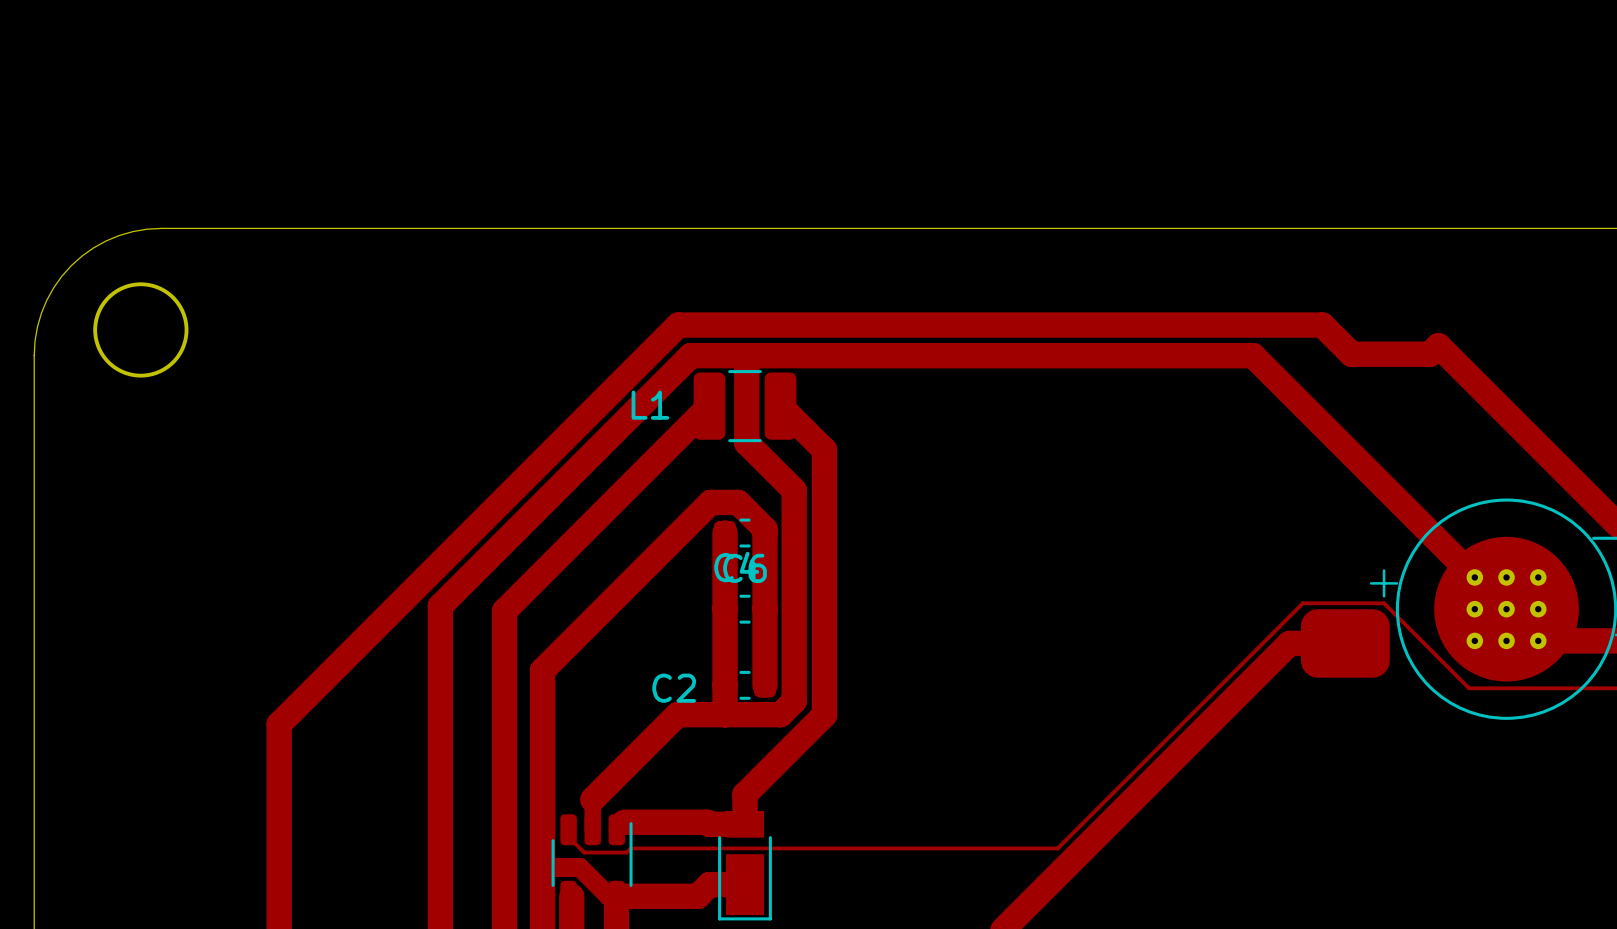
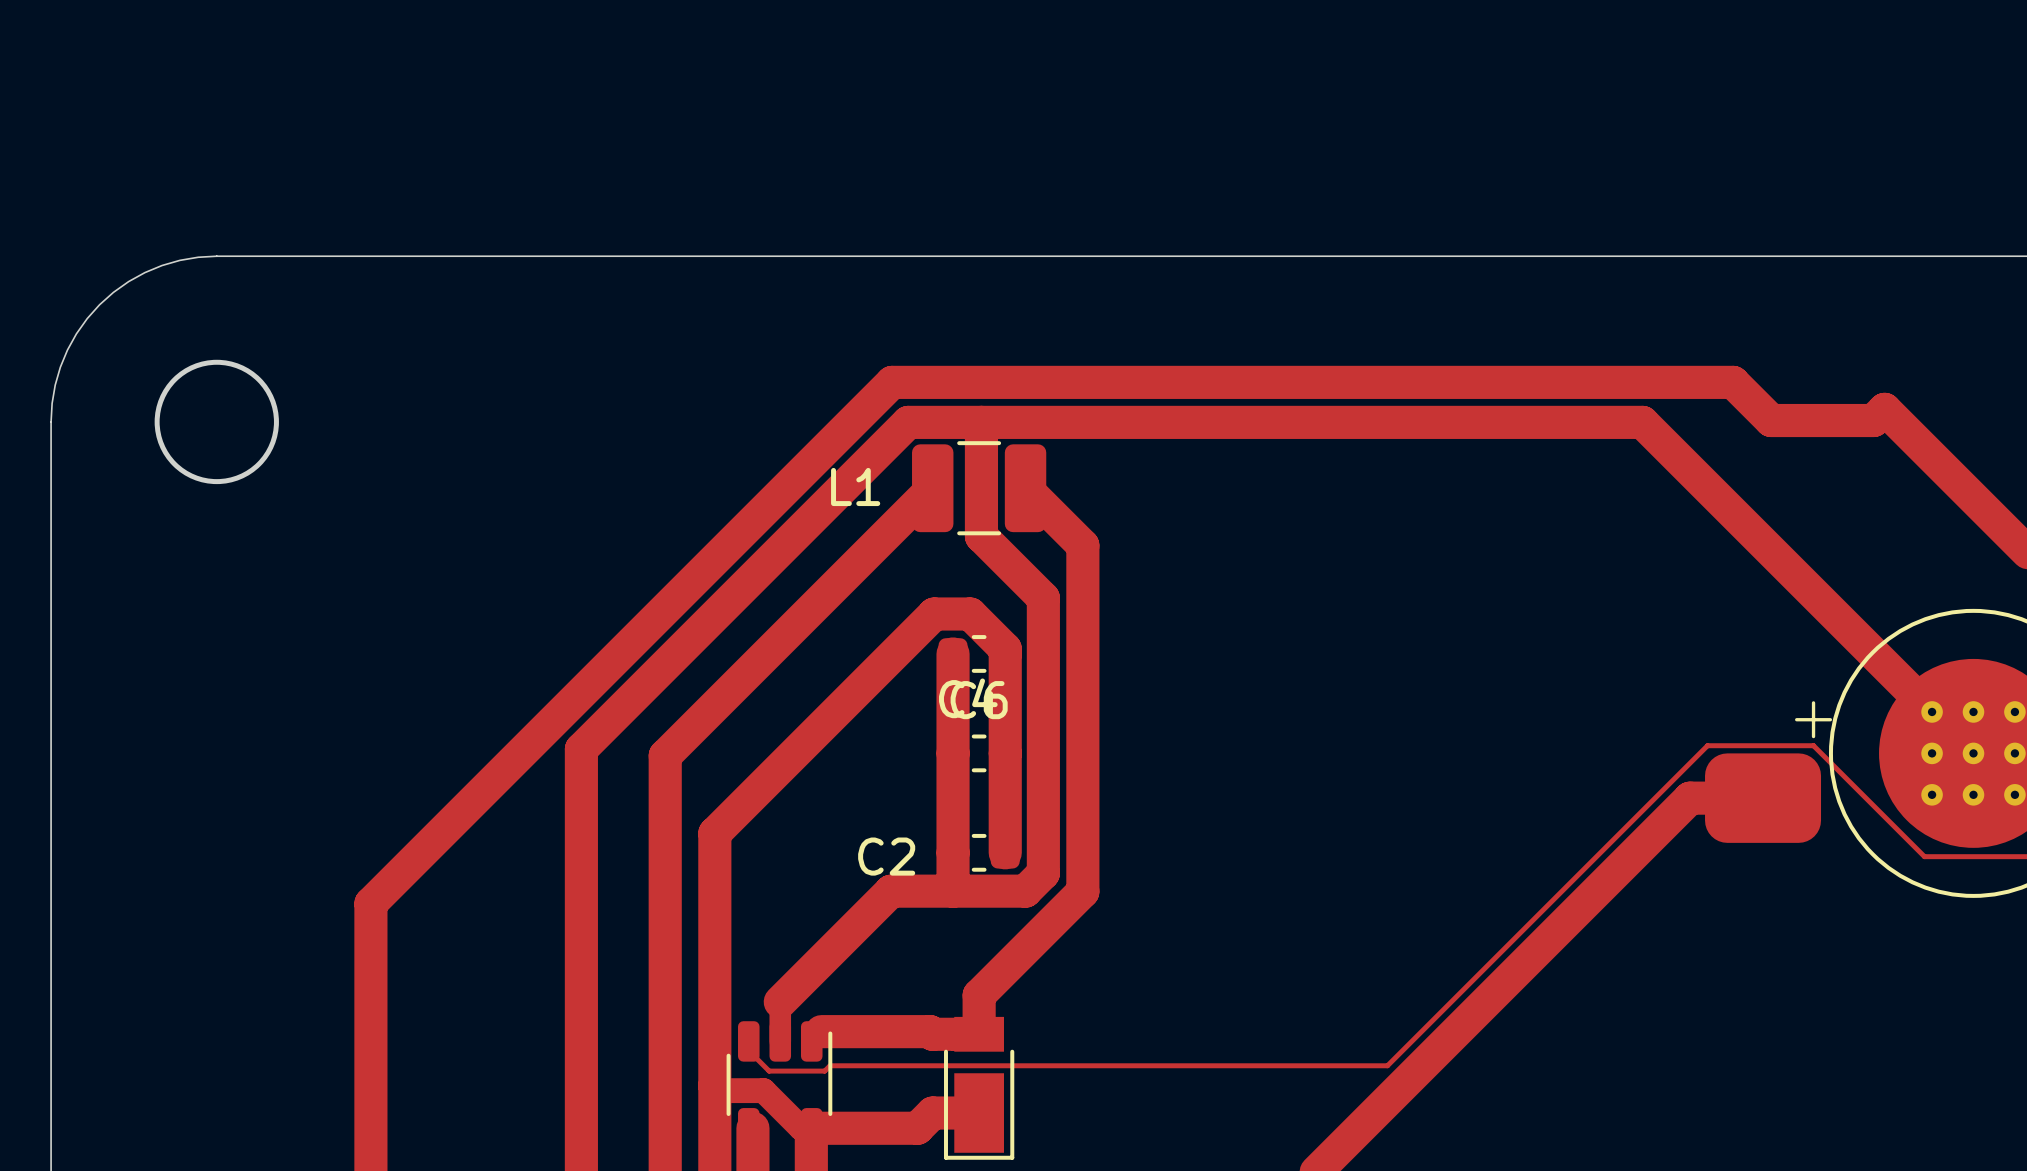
round board edge position: (140, 329) -> (216, 421)

